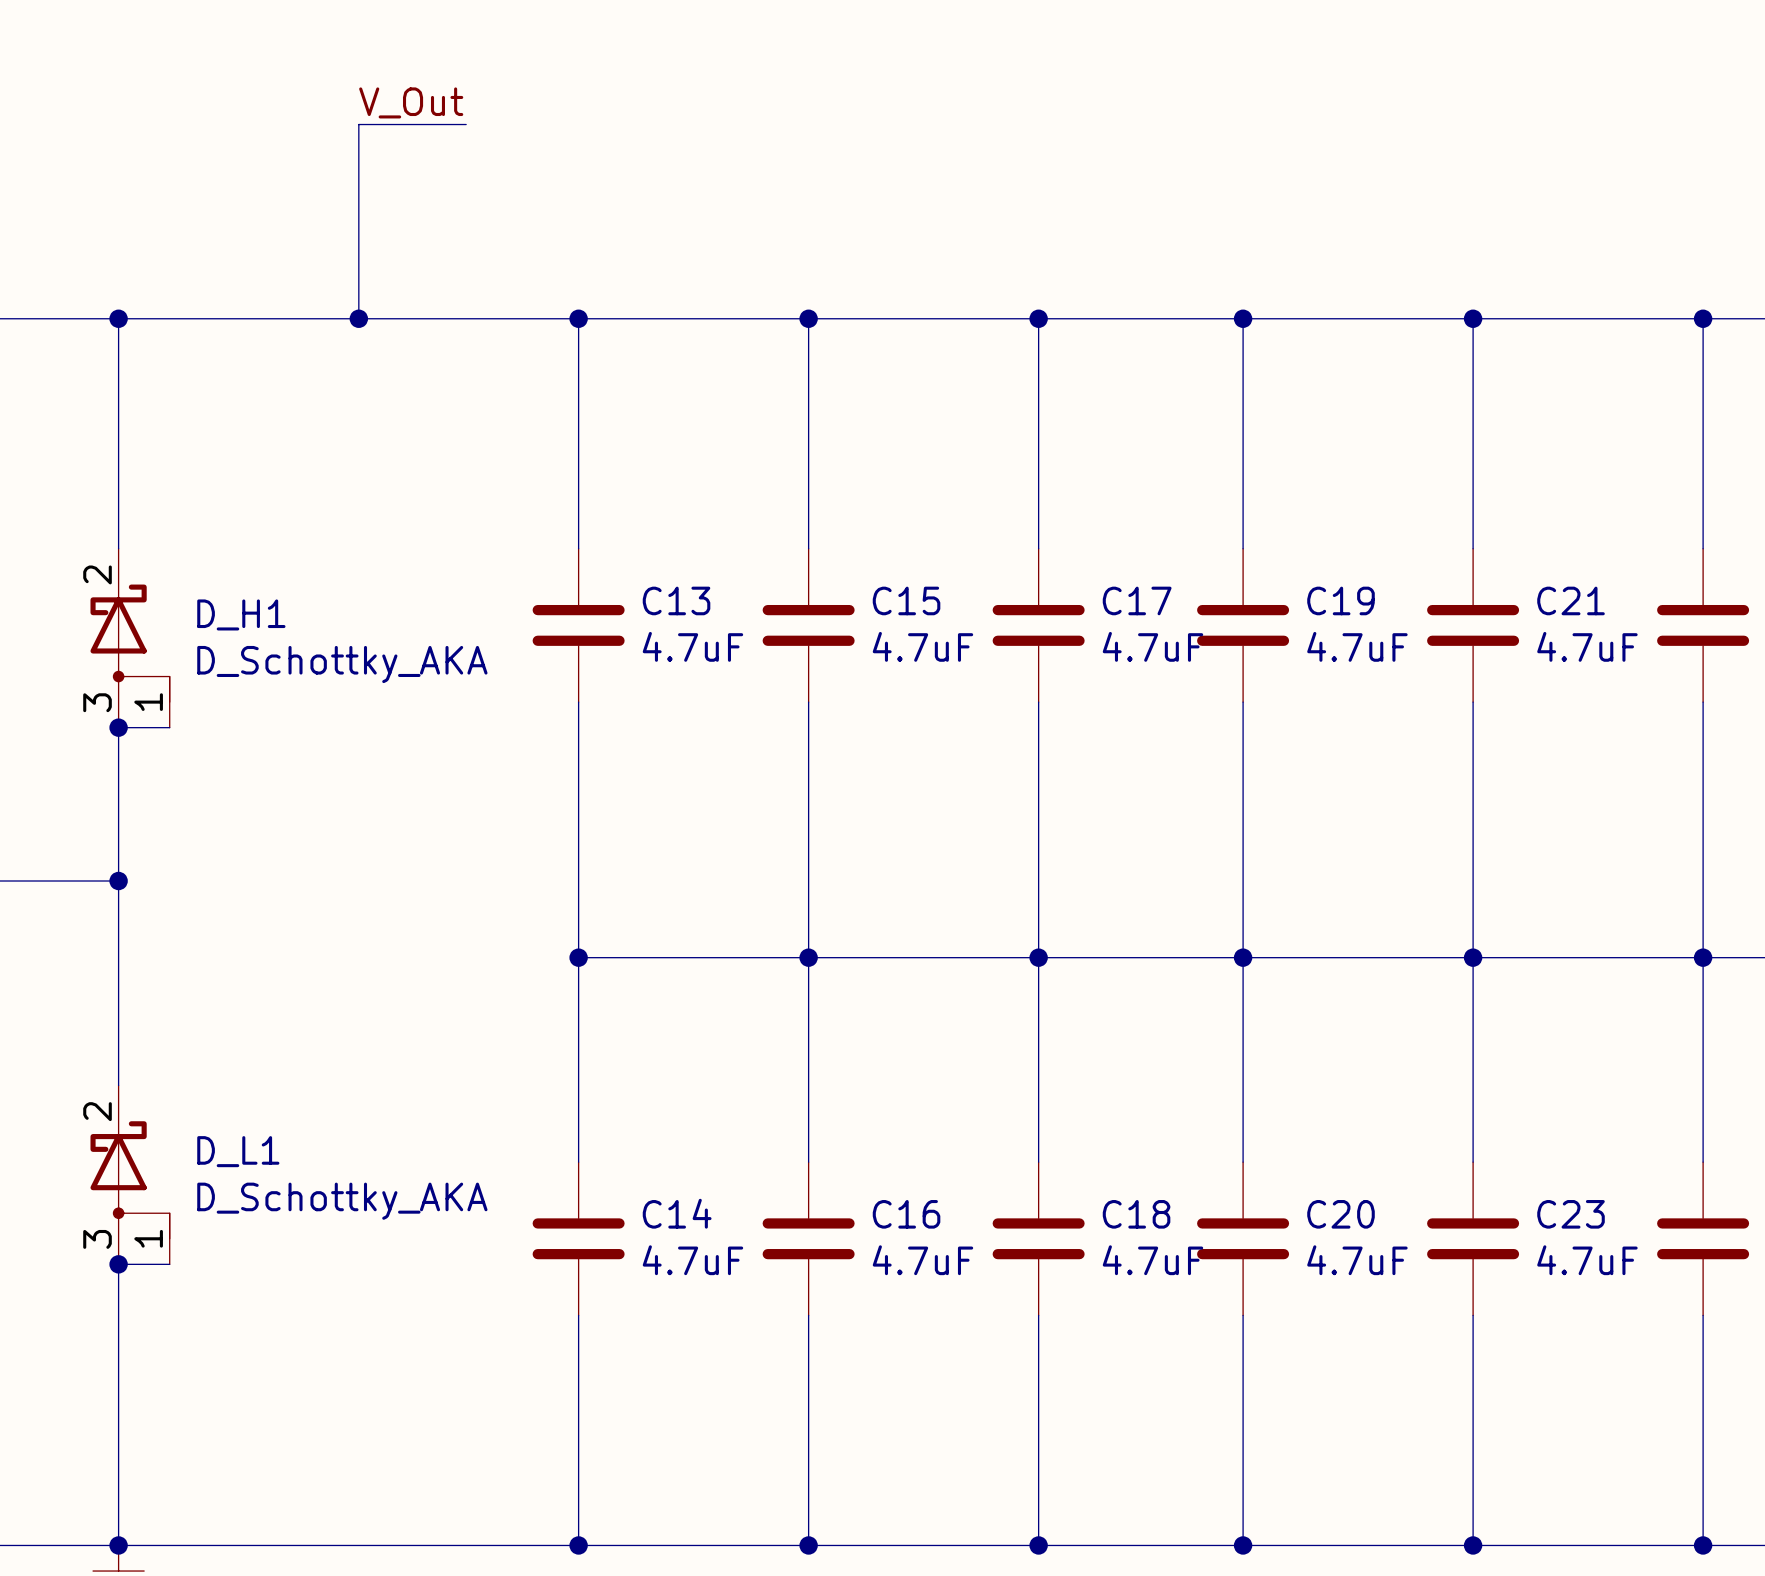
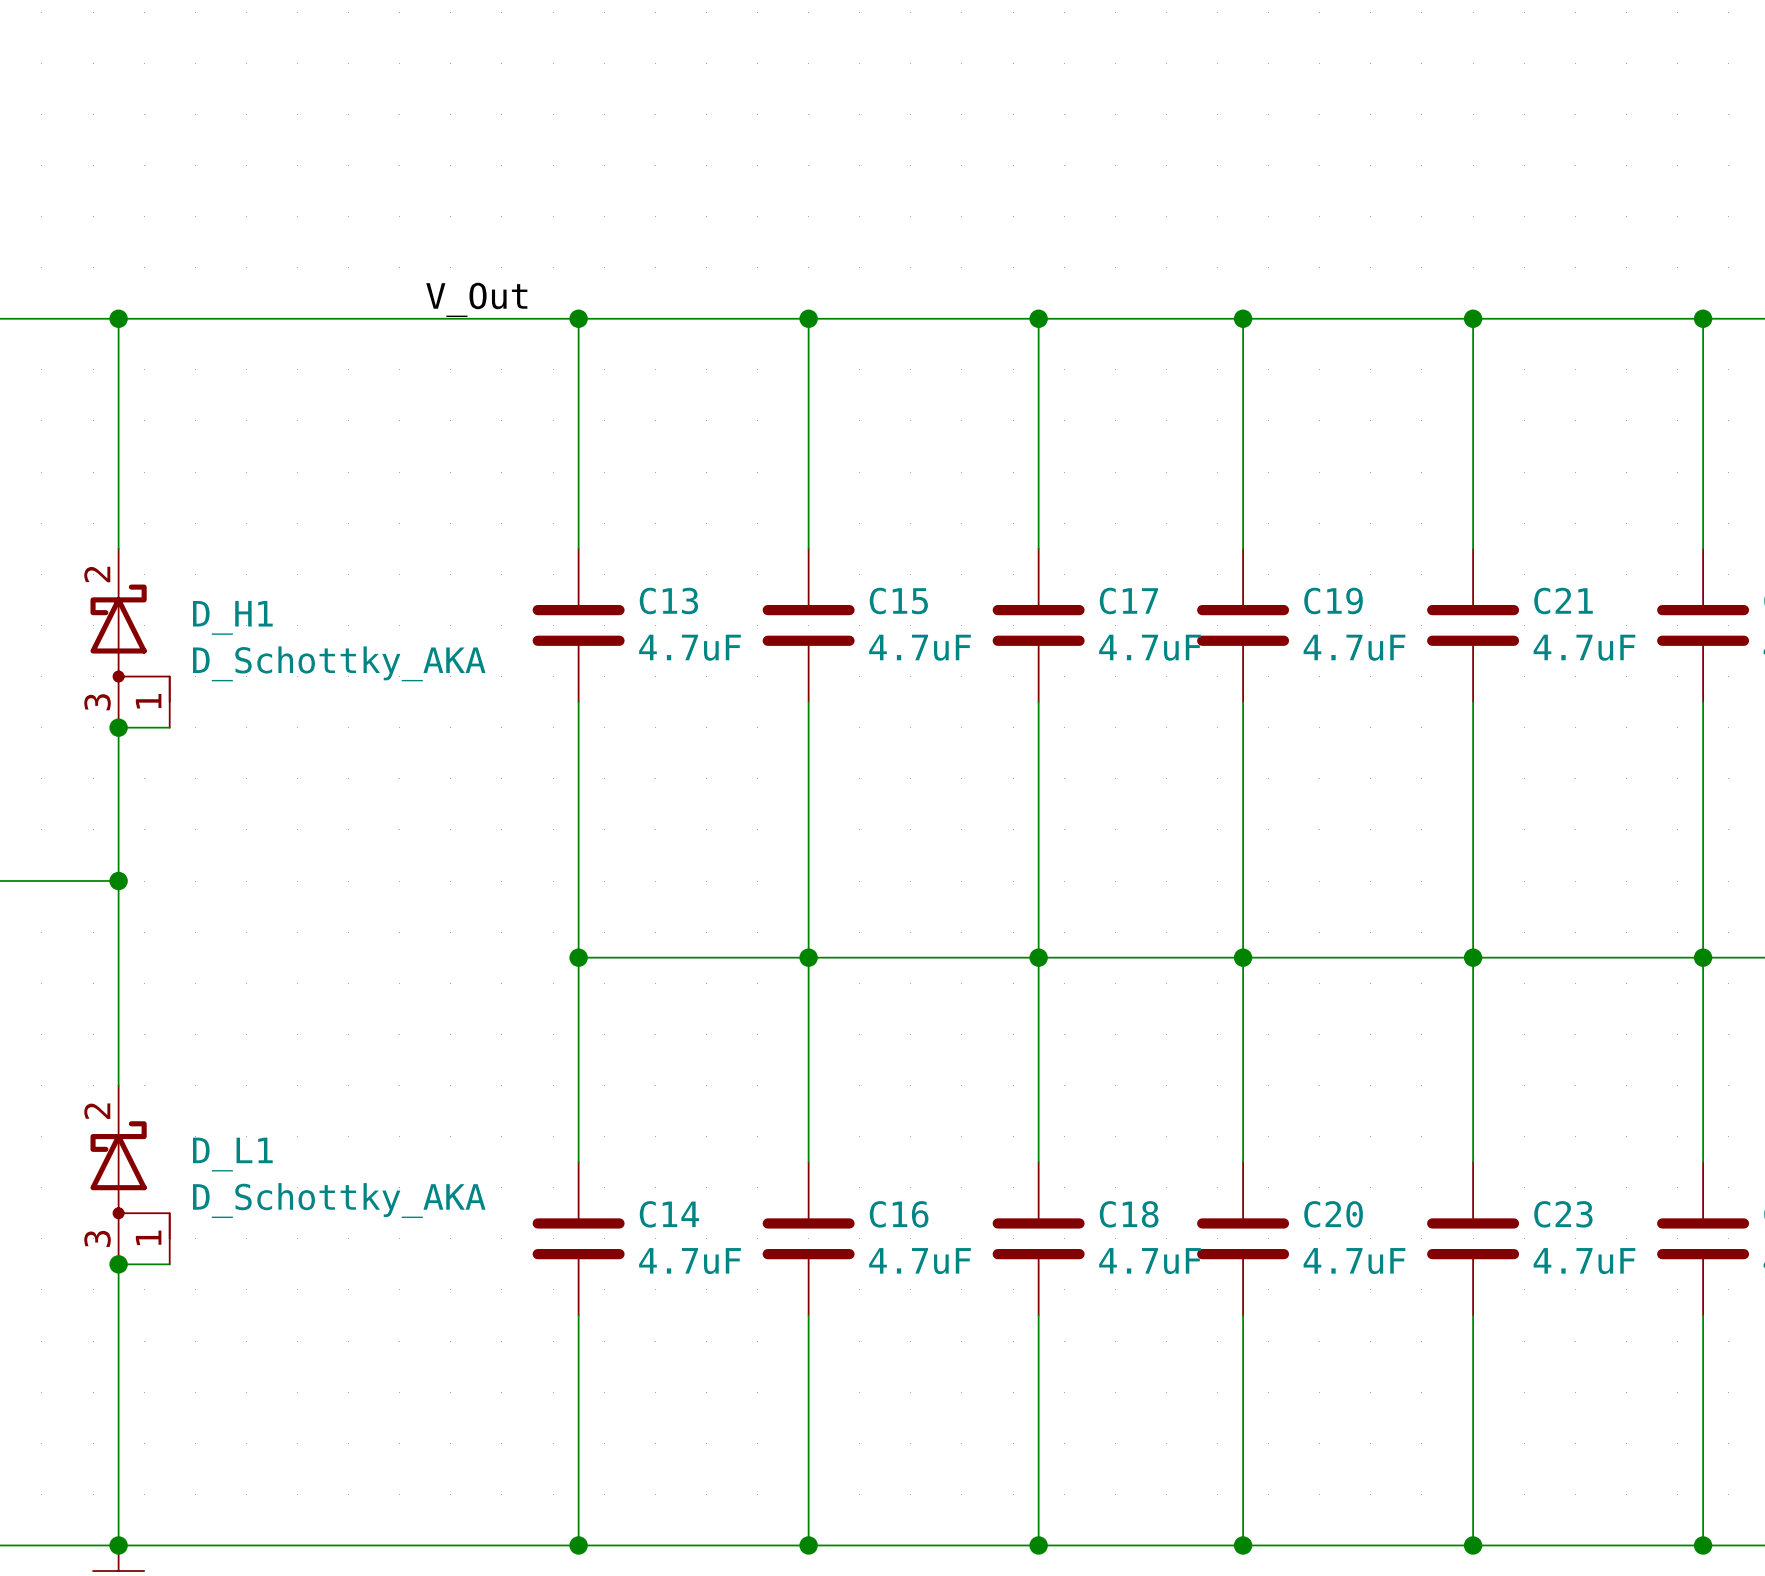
label position: V_Out (411, 102) -> V_Out (476, 299)
wire: (466, 124) (358, 124) (358, 318) -> none
junction: (358, 318) -> none

